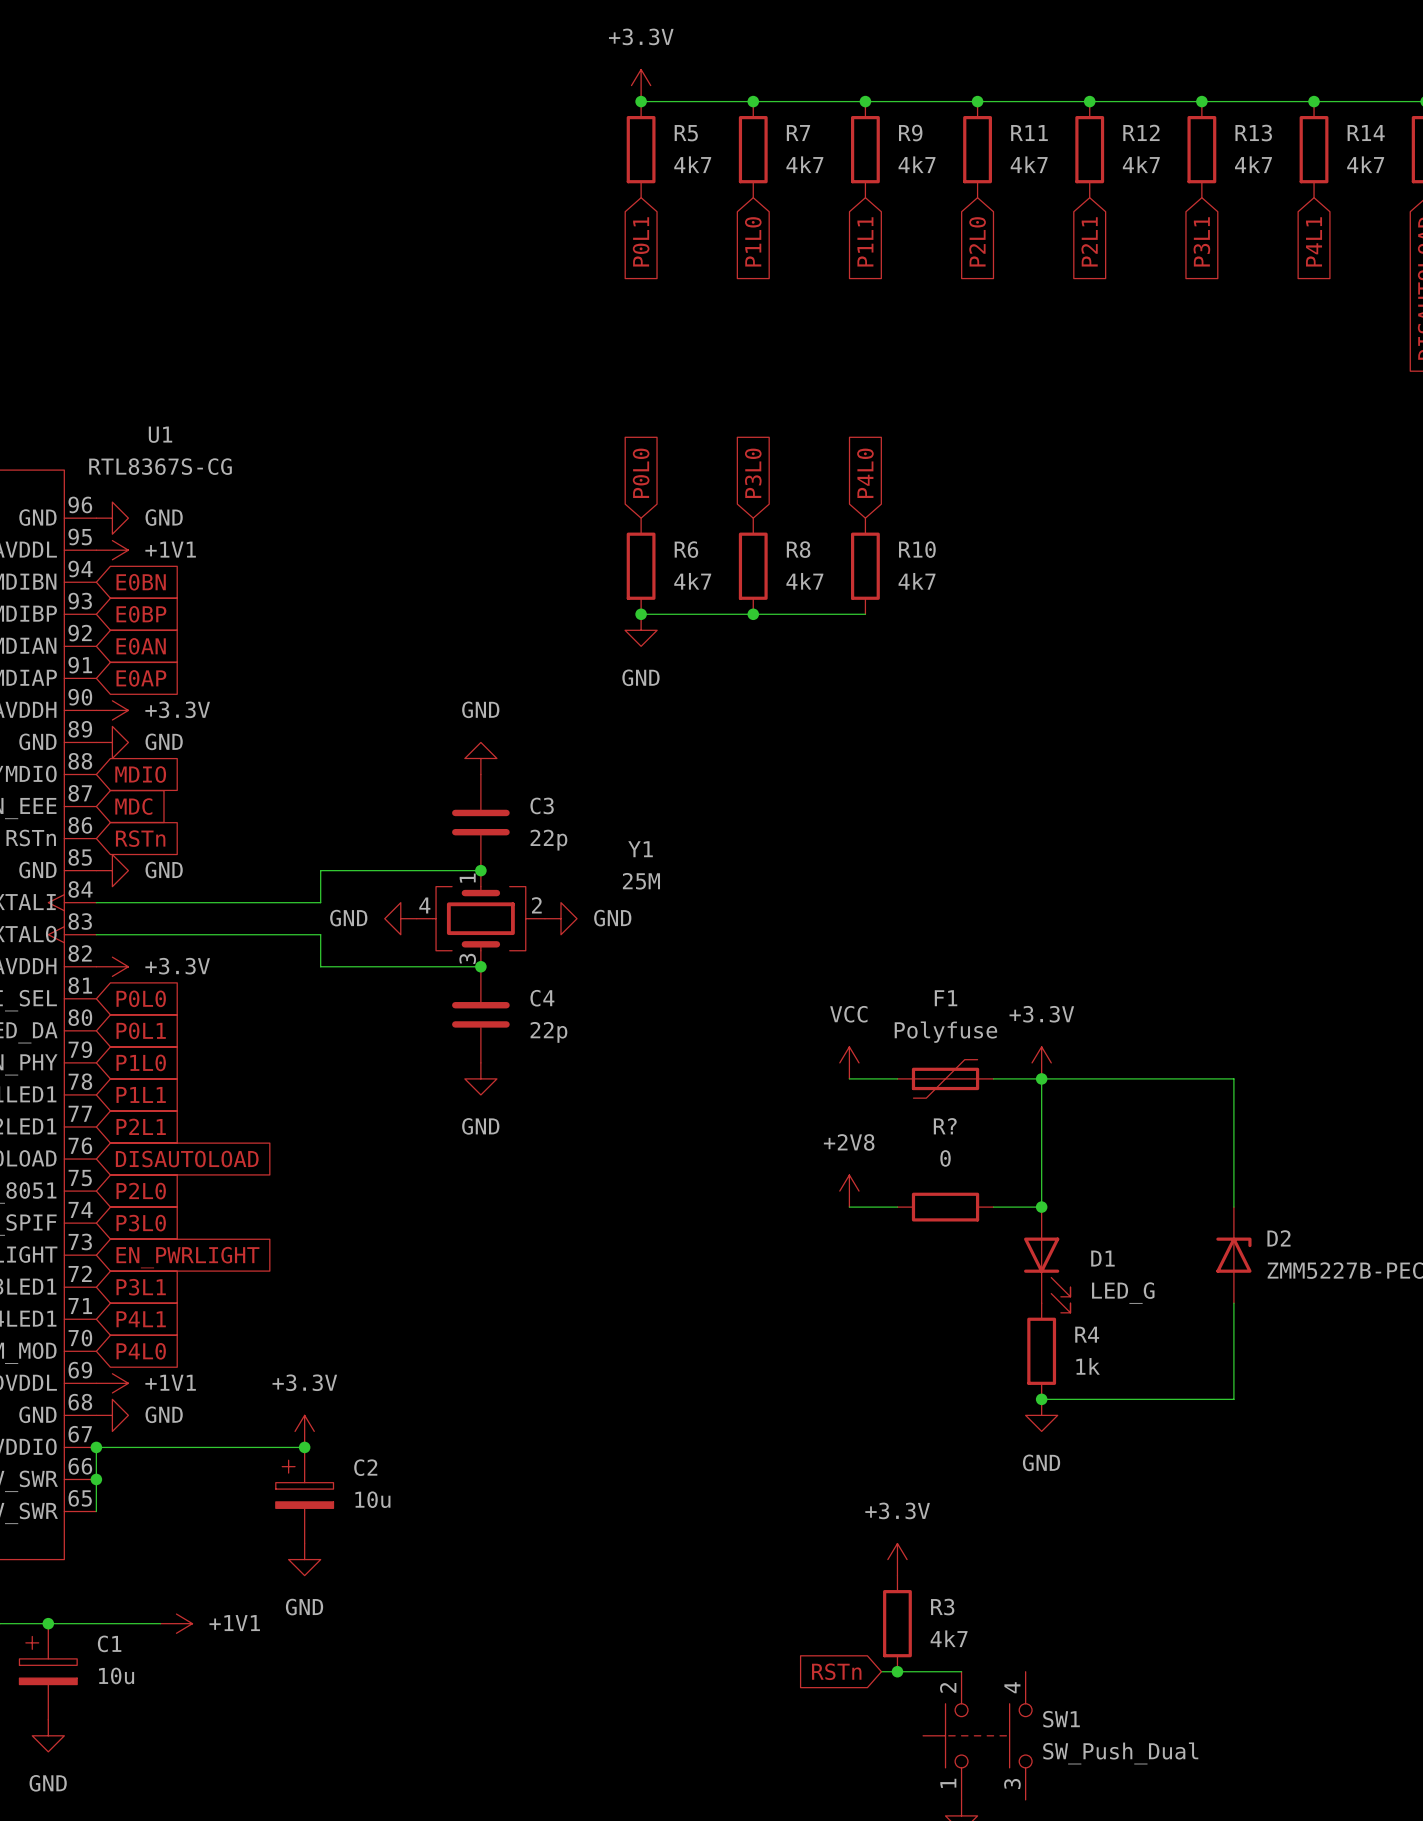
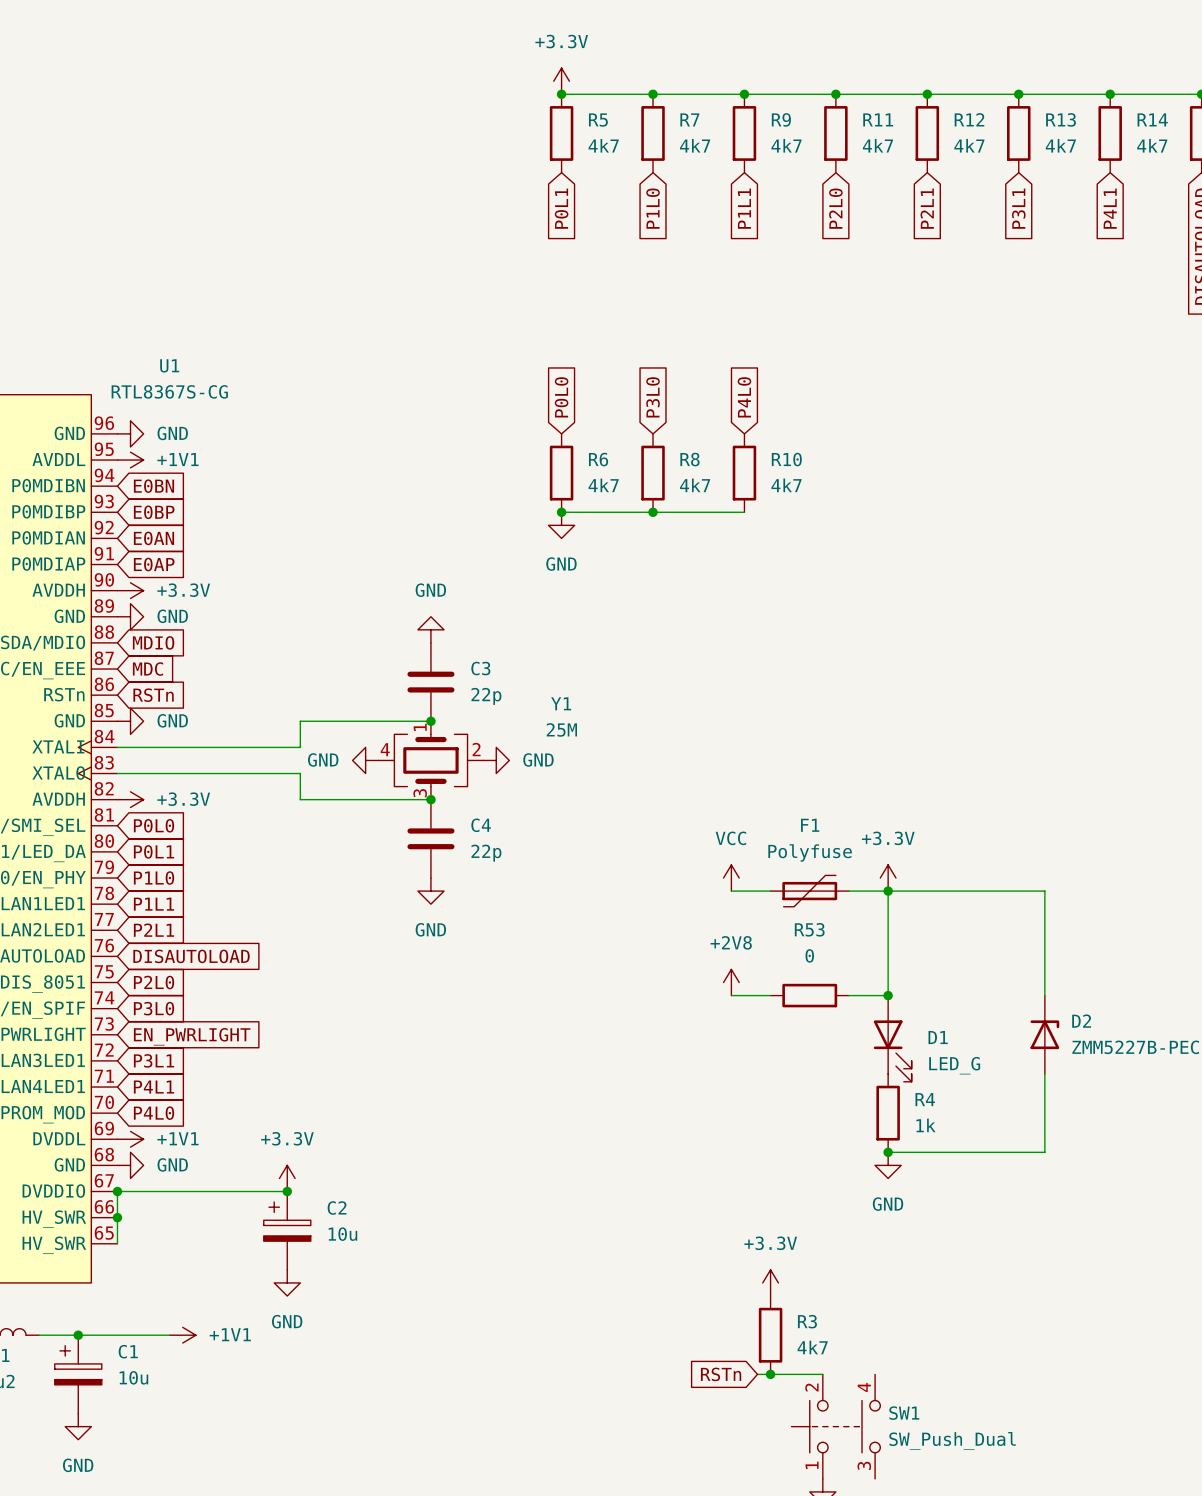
R? name: R? (945, 1126) -> R53 (809, 929)

